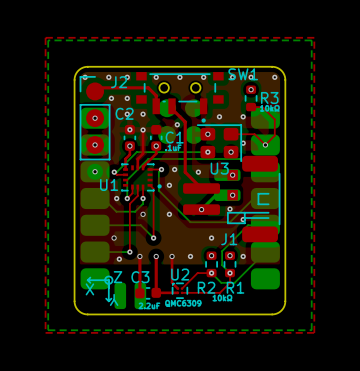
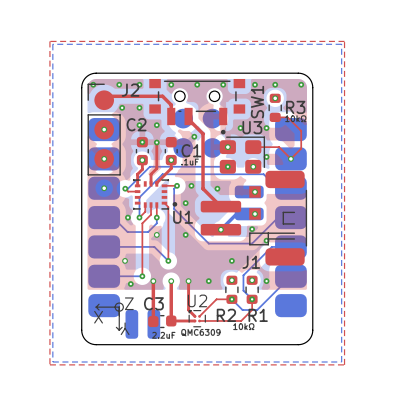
SW1 name rotation: 0° (243, 74) -> 90° counterclockwise (257, 102)
U3 footprint: [197, 124, 242, 162] -> [219, 136, 266, 174]
U3 name position: U3 (219, 168) -> U3 (252, 127)
U1 name position: U1 (109, 184) -> U1 (183, 217)

